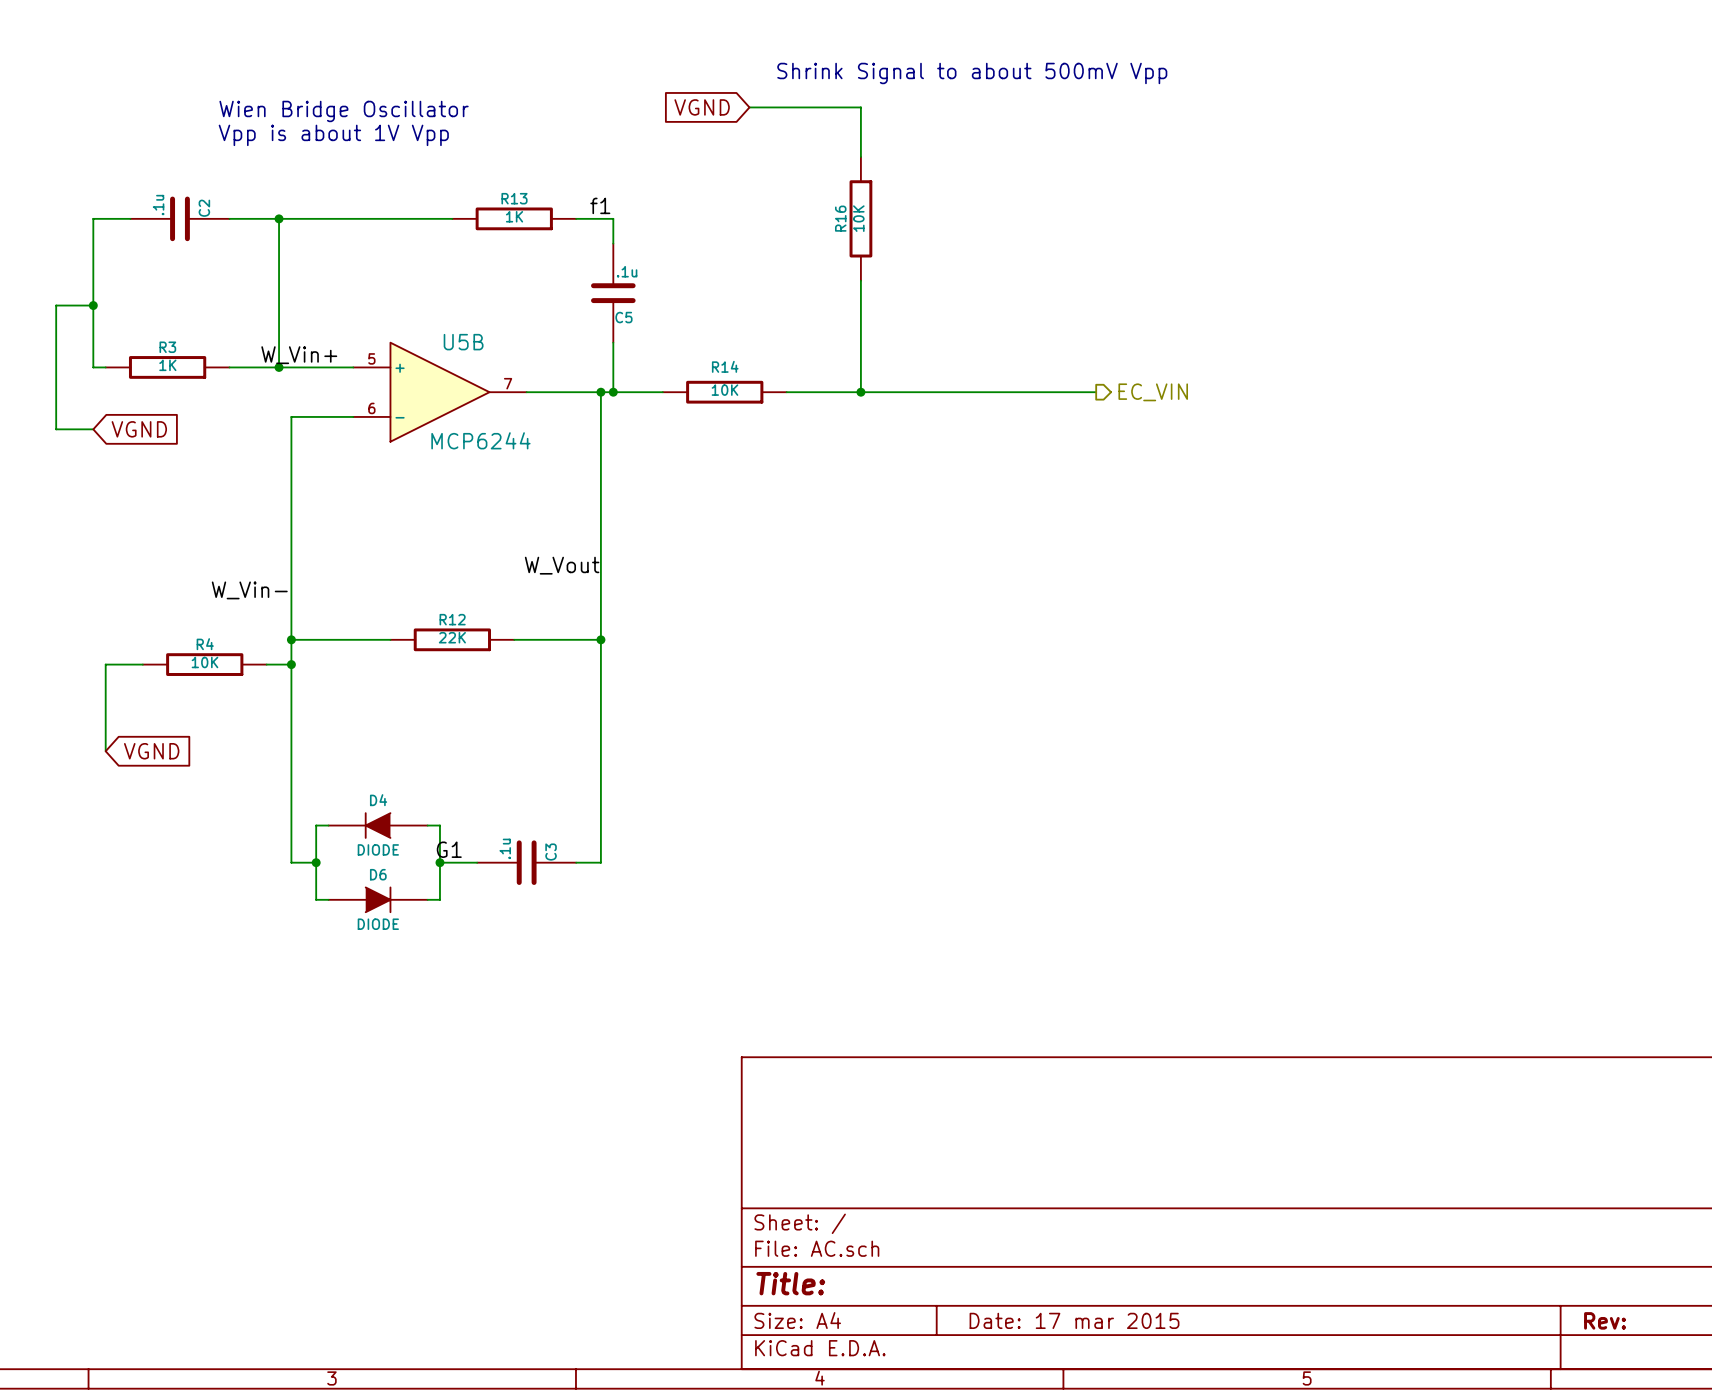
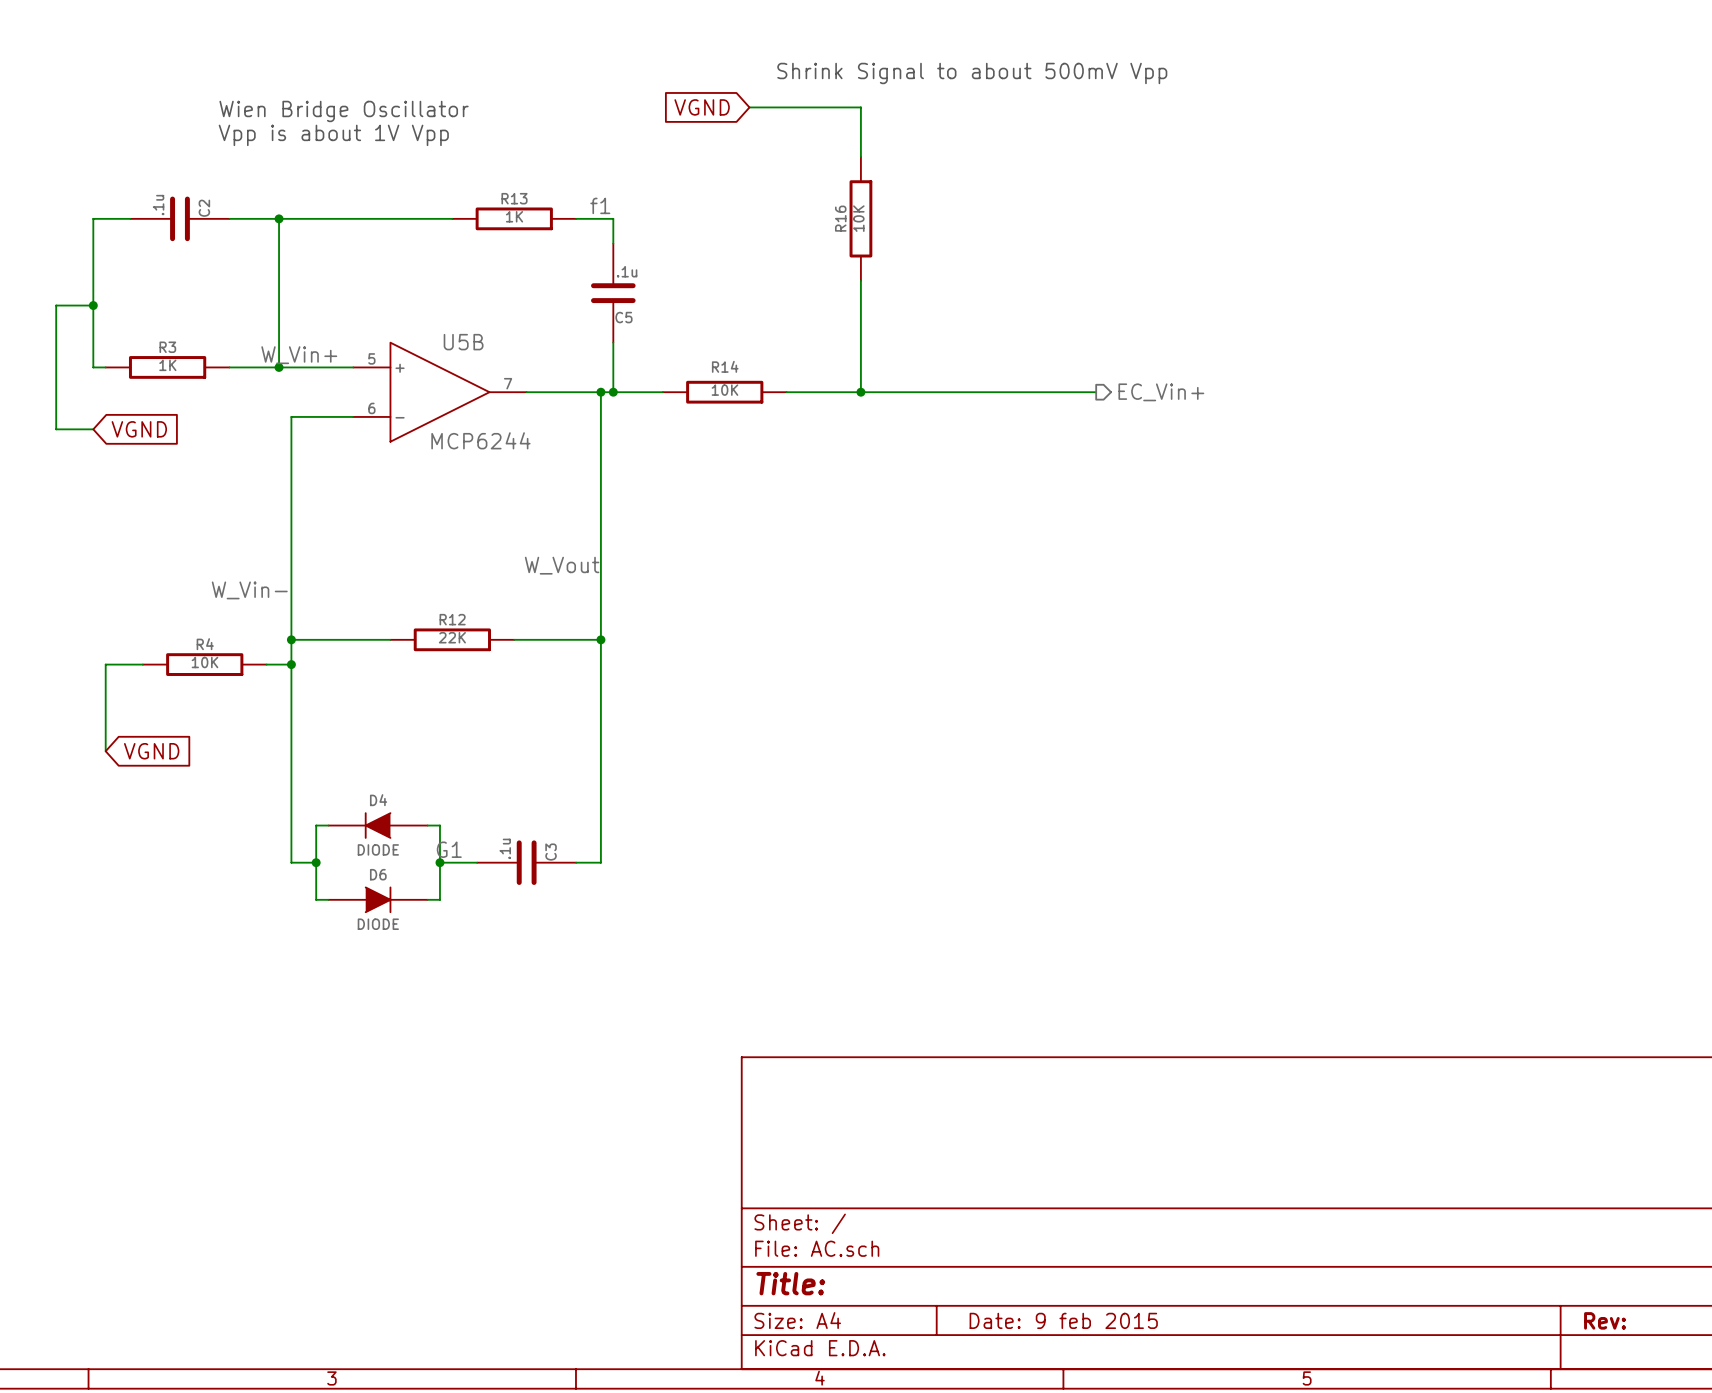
hierarchical label: EC_VIN (1153, 392) -> EC_Vin+ (1161, 392)
title block: Date: 17 mar 2015 (1074, 1320) -> Date: 9 feb 2015 (1063, 1320)

